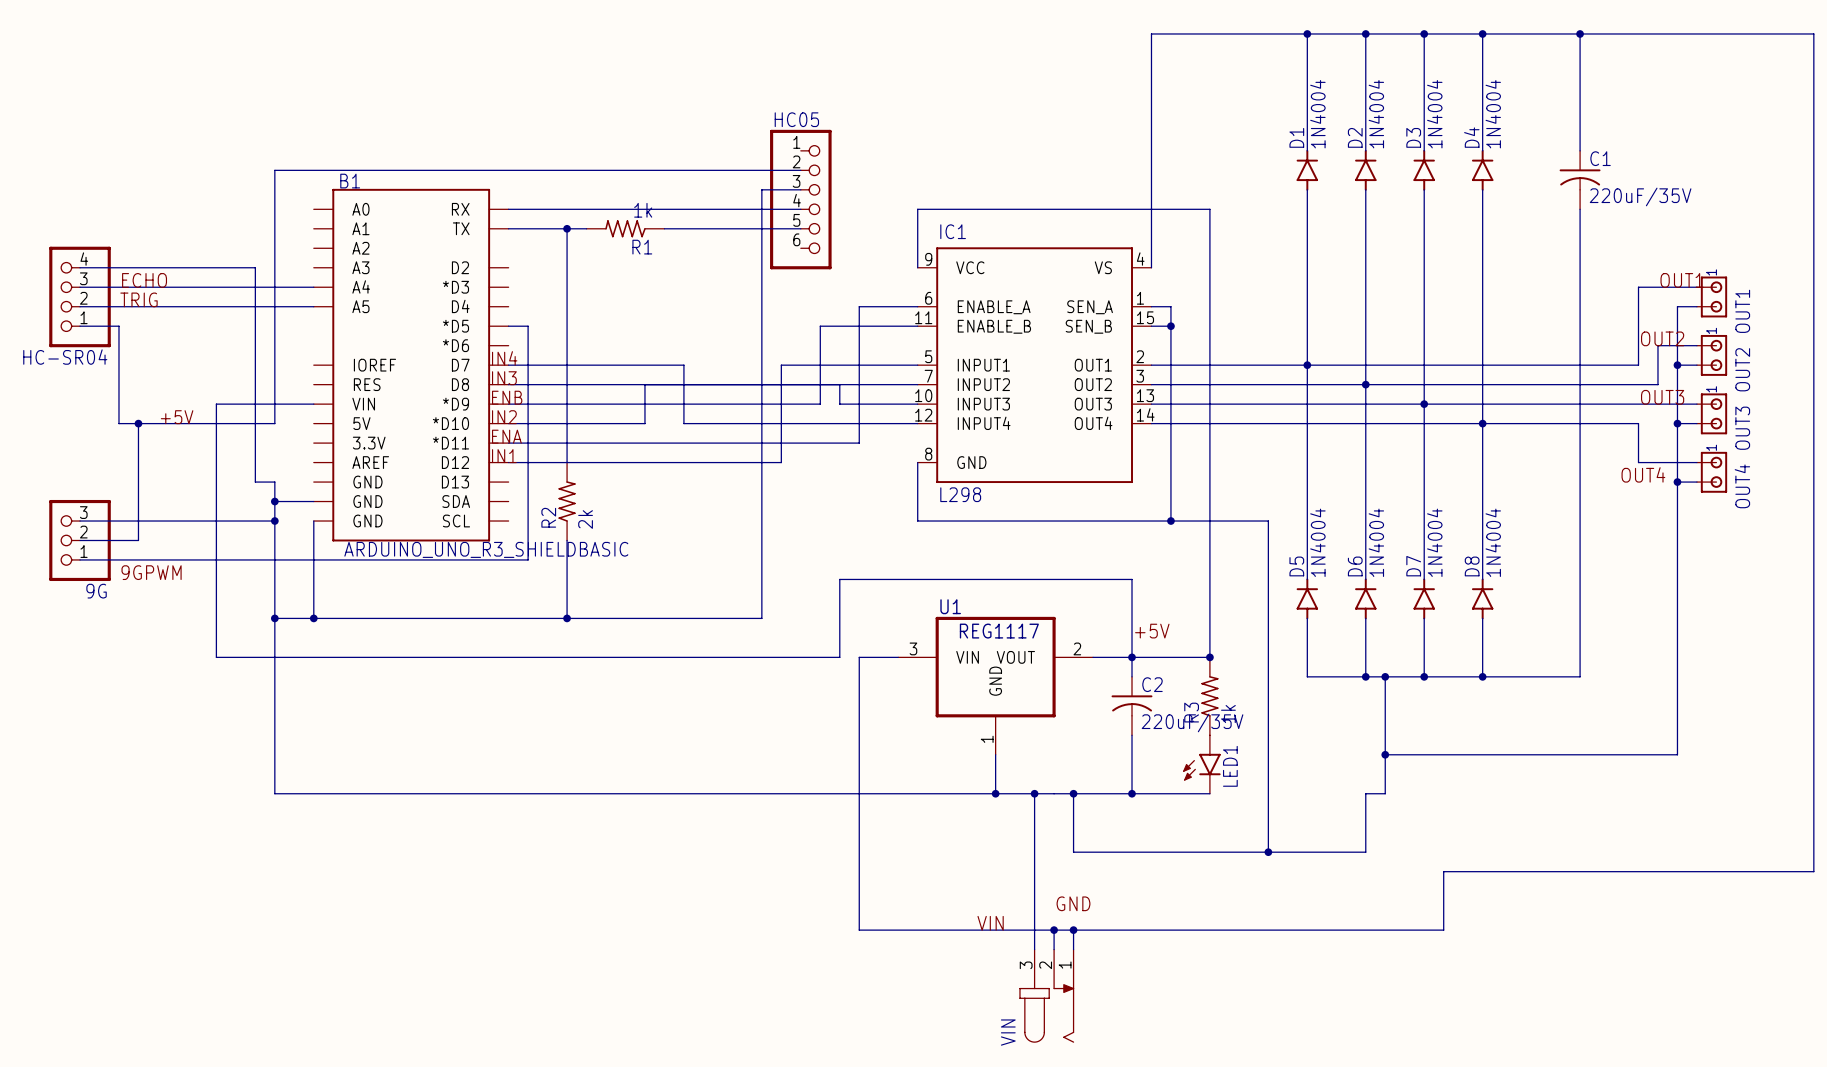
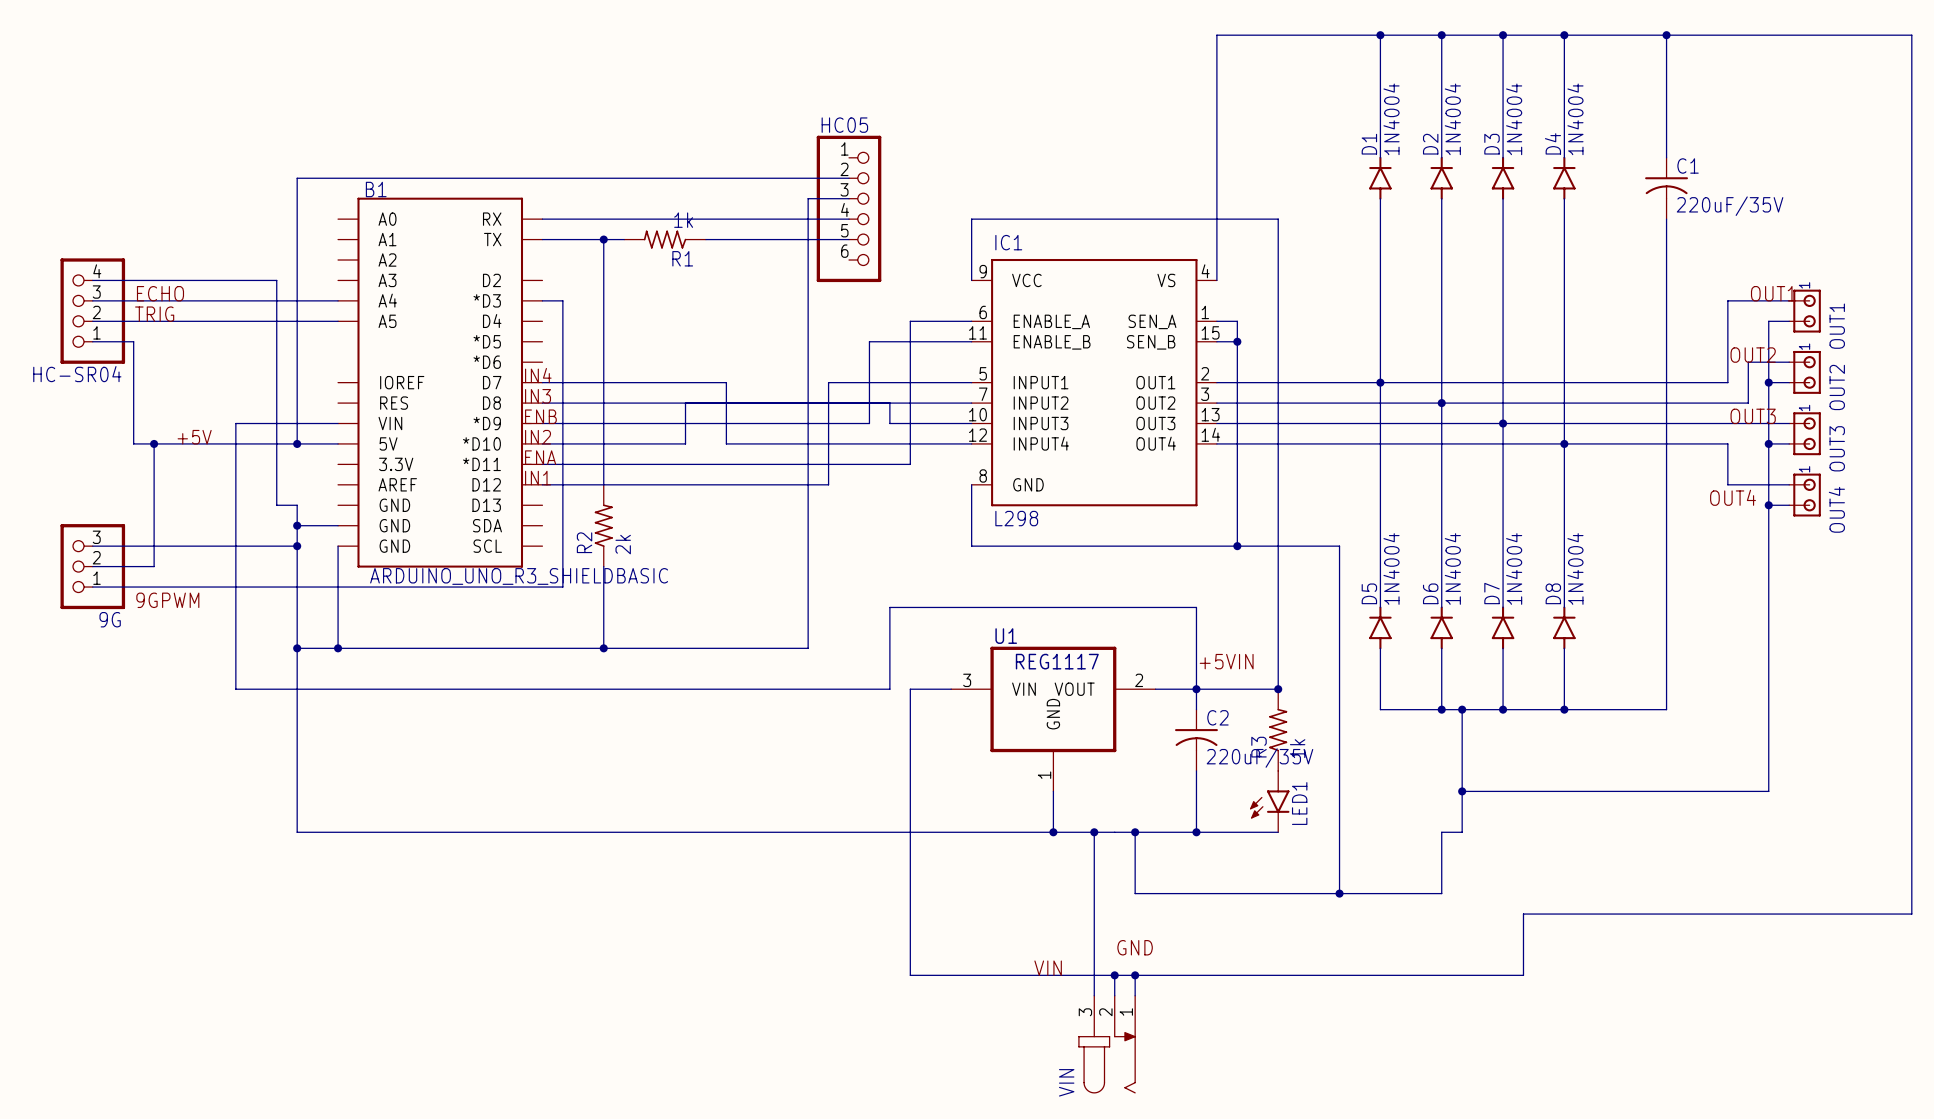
wire: (508, 326) (528, 326) -> (542, 300) (562, 300) (562, 341)
wire: none -> (297, 443) (338, 443)
junction: none -> (297, 443)
label: +5V (1152, 631) -> +5VIN (1226, 661)

